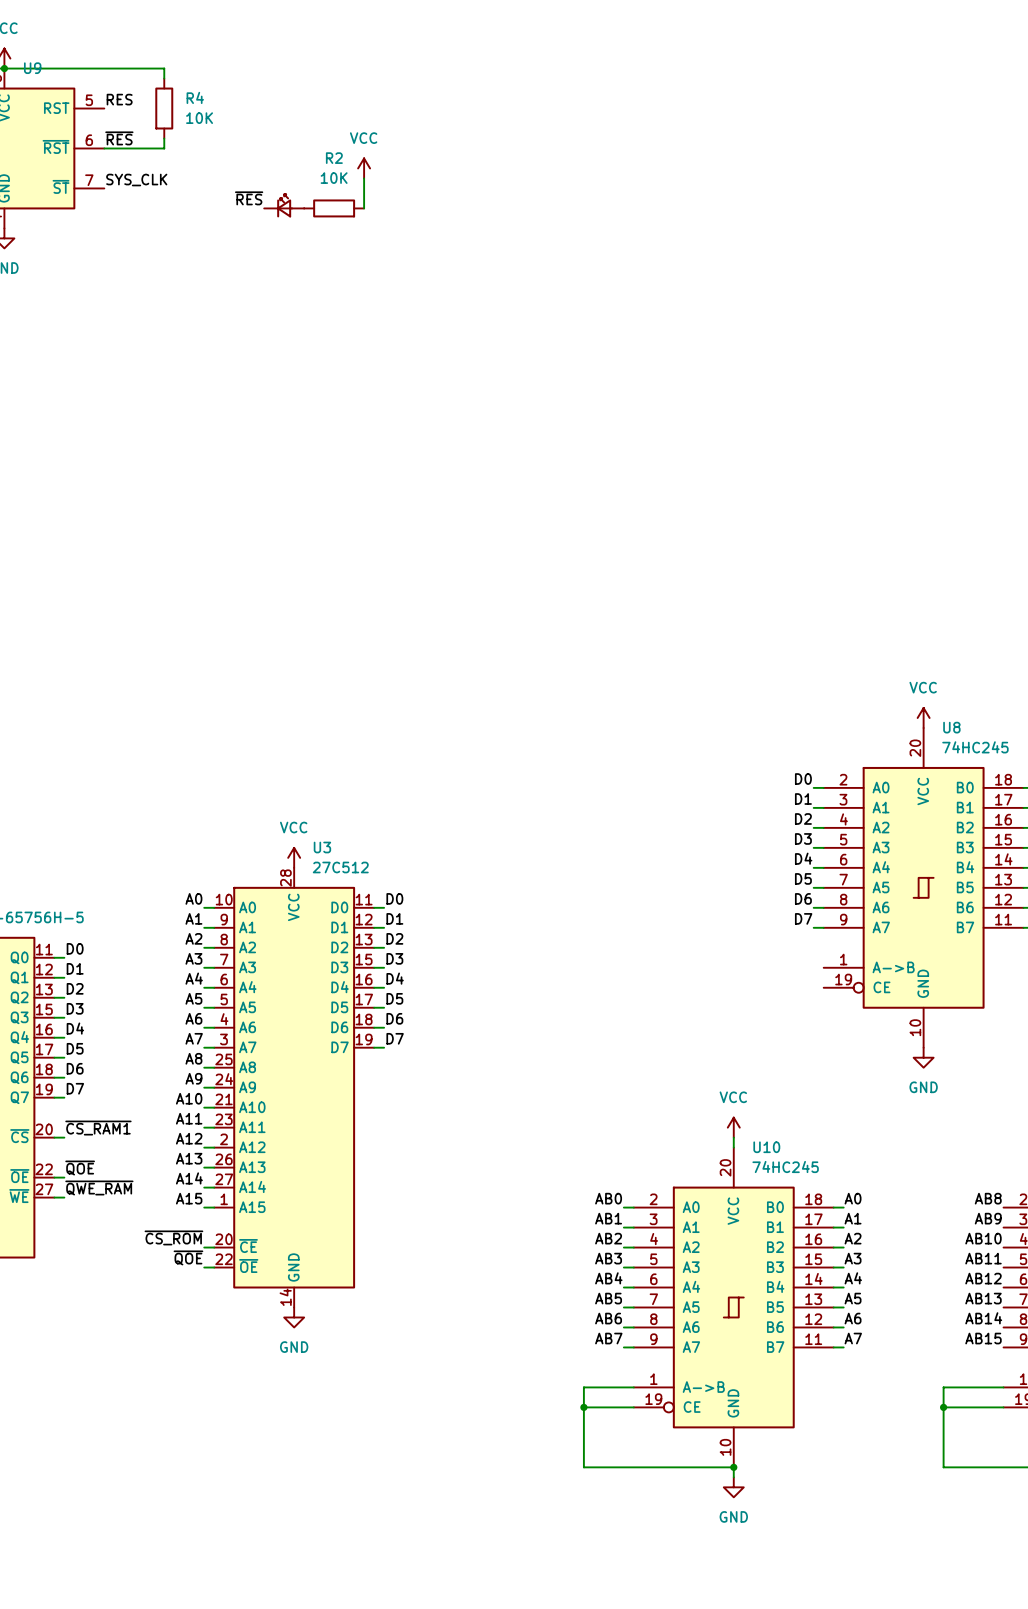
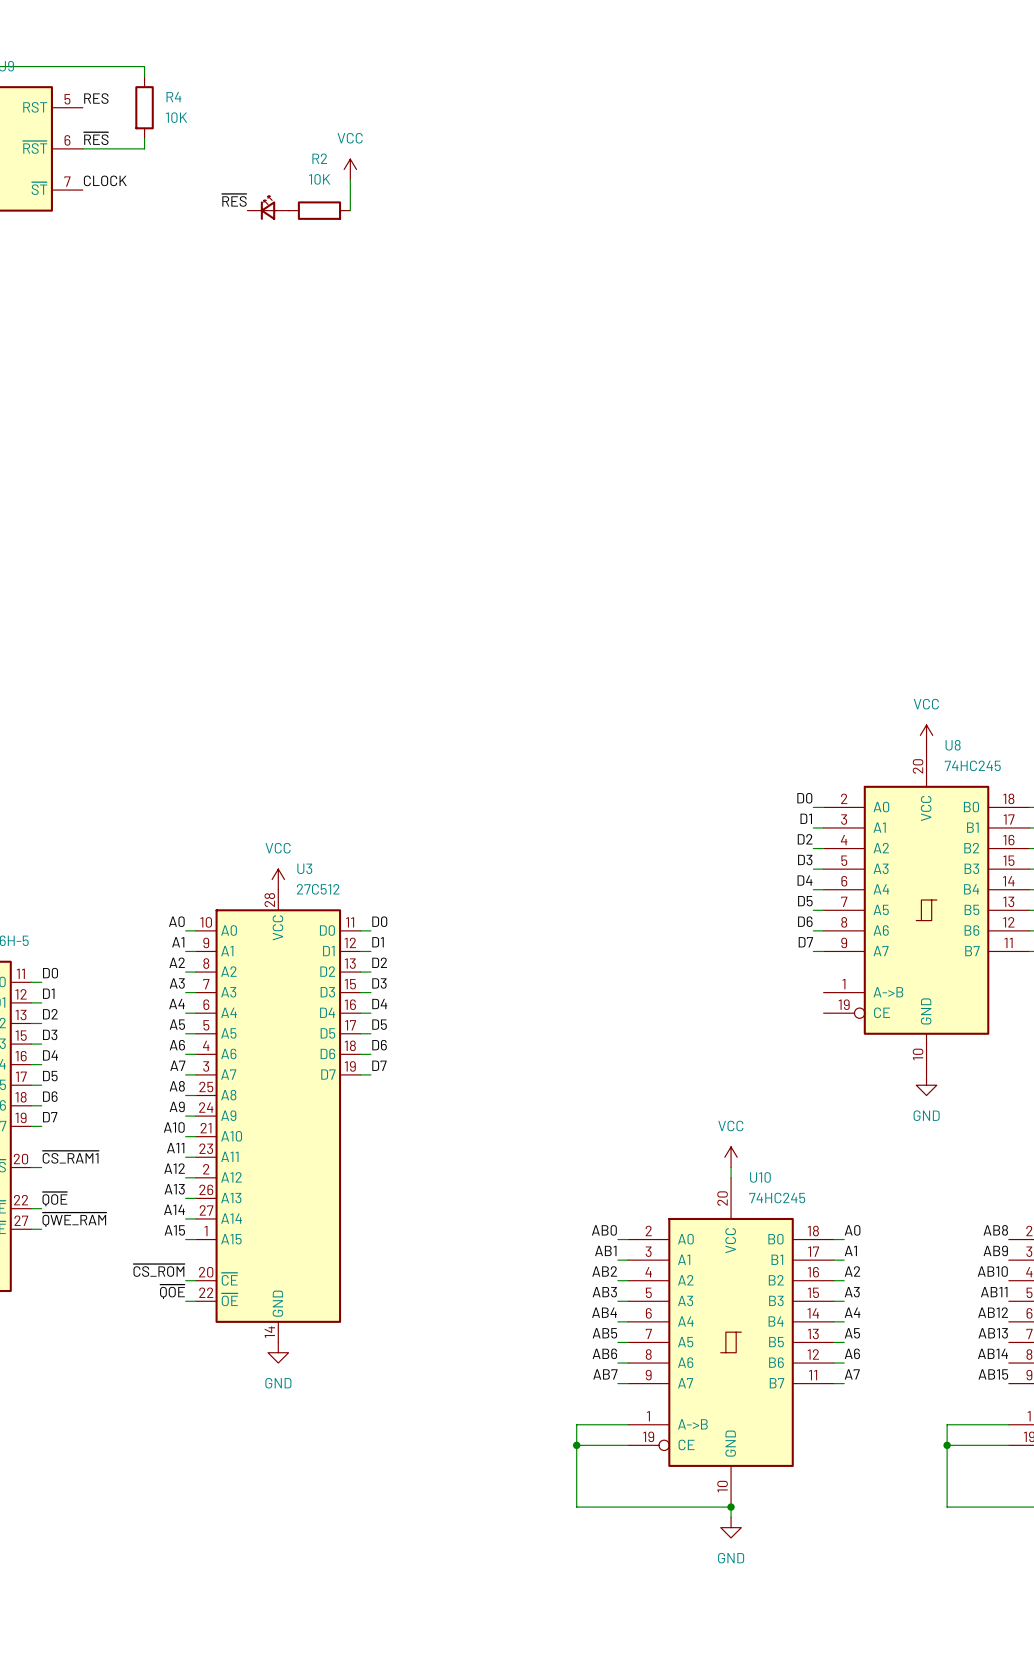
label: SYS_CLK (136, 180) -> CLOCK (105, 180)

